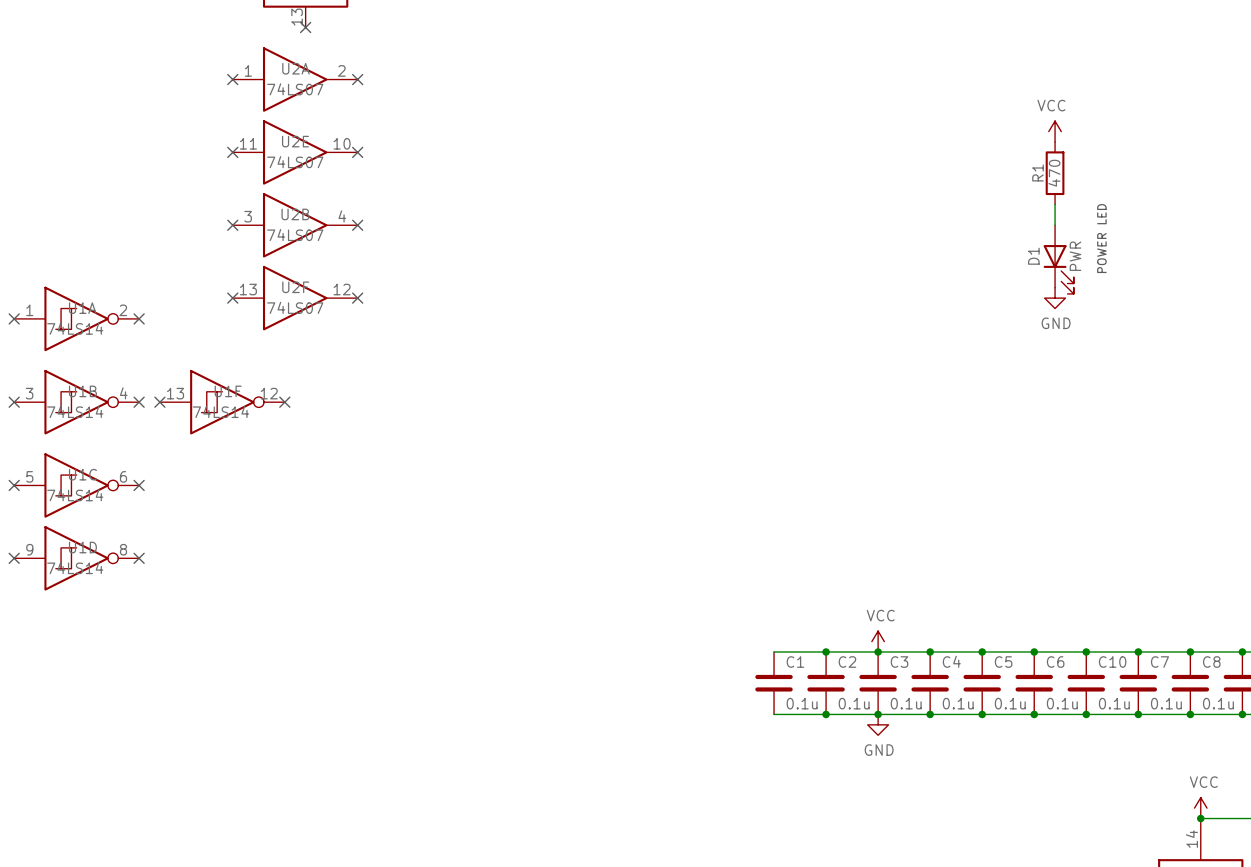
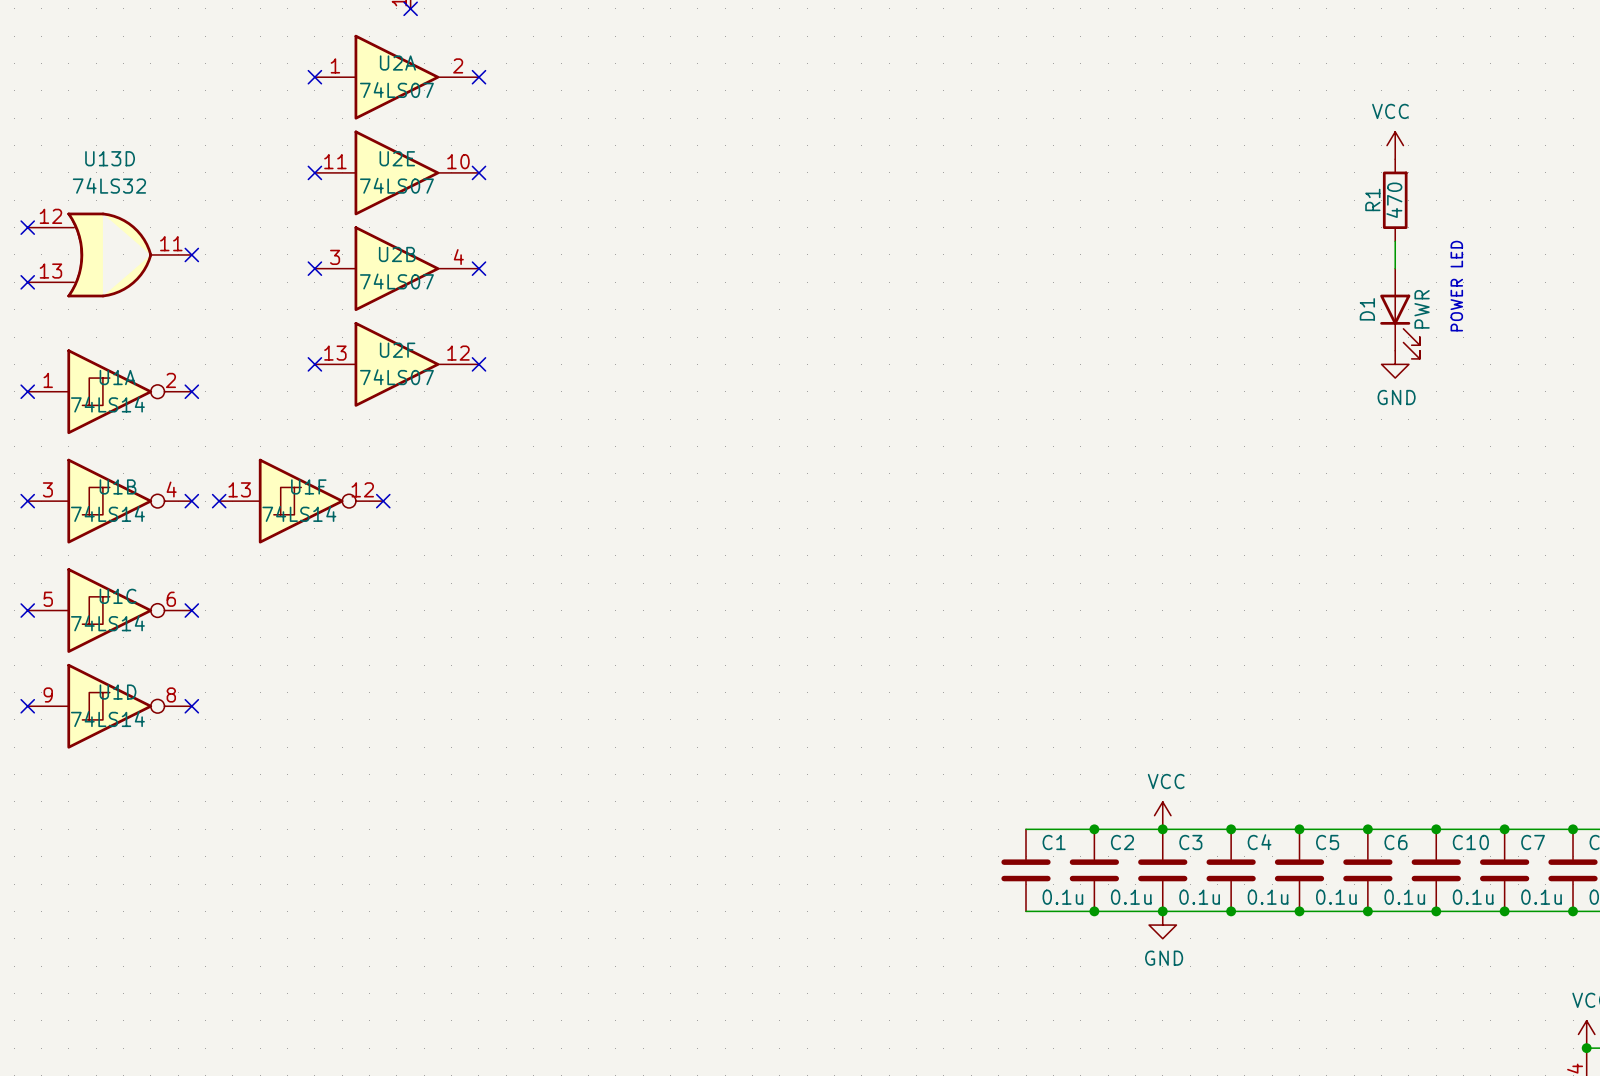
no-connect mark: none -> (27, 227)
U13D: none -> 74LS32 (109, 254)
no-connect mark: none -> (191, 254)
no-connect mark: none -> (27, 282)

